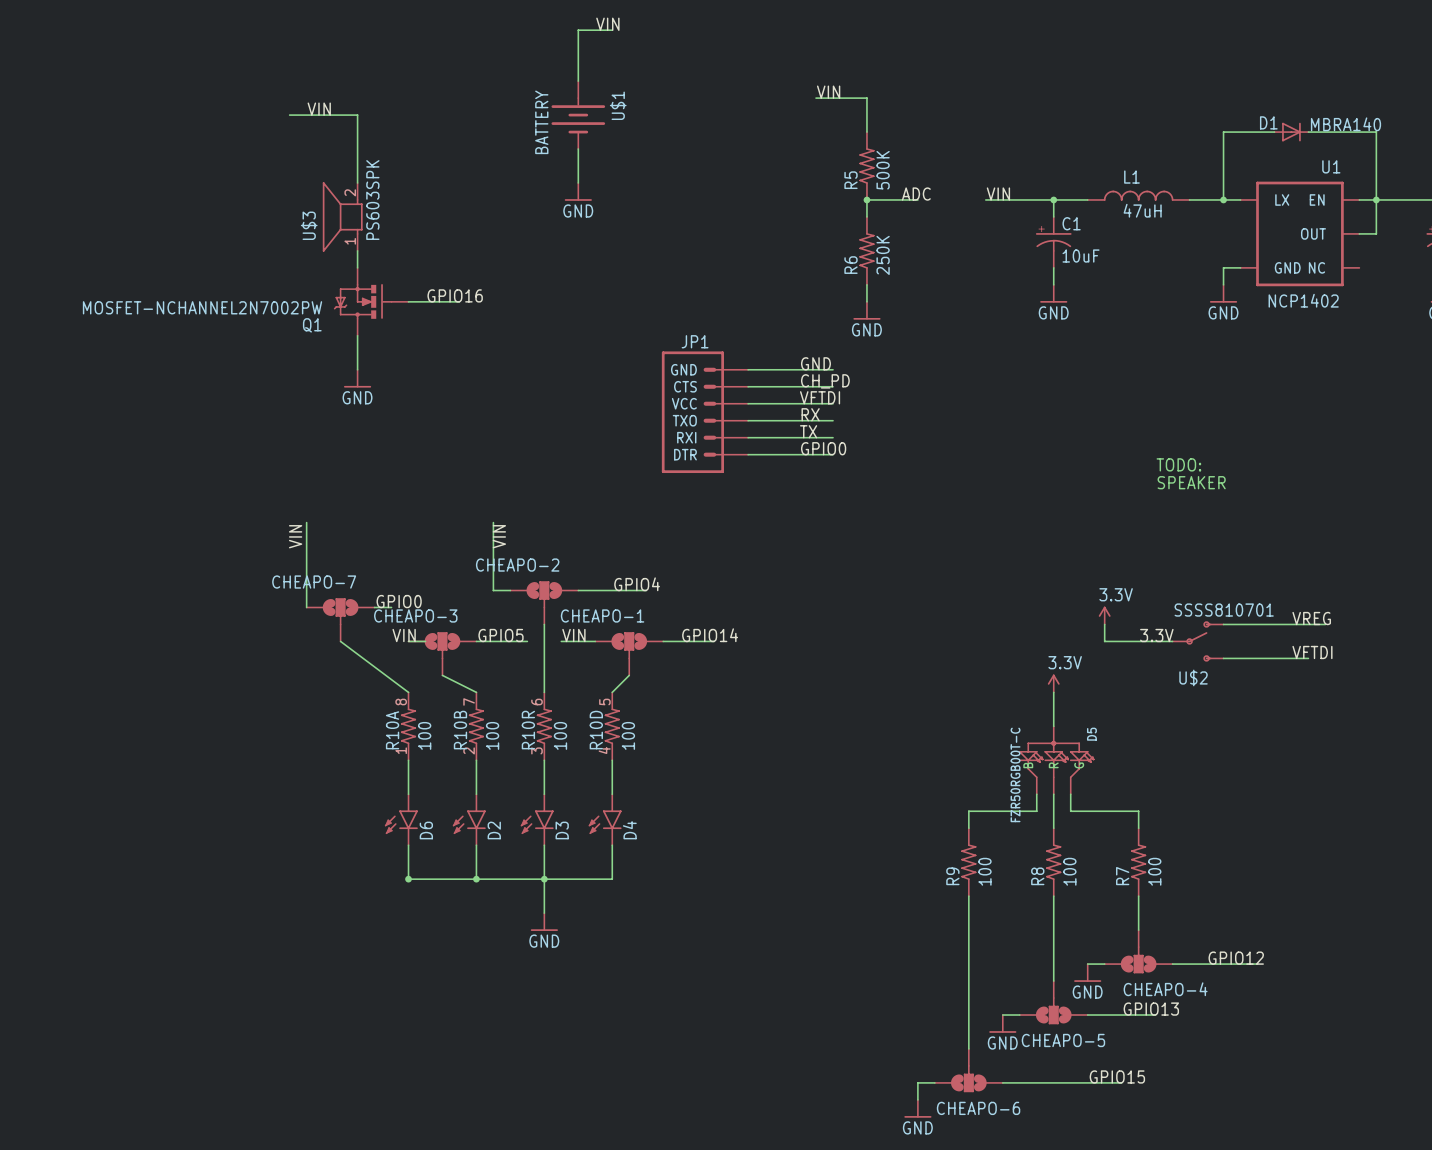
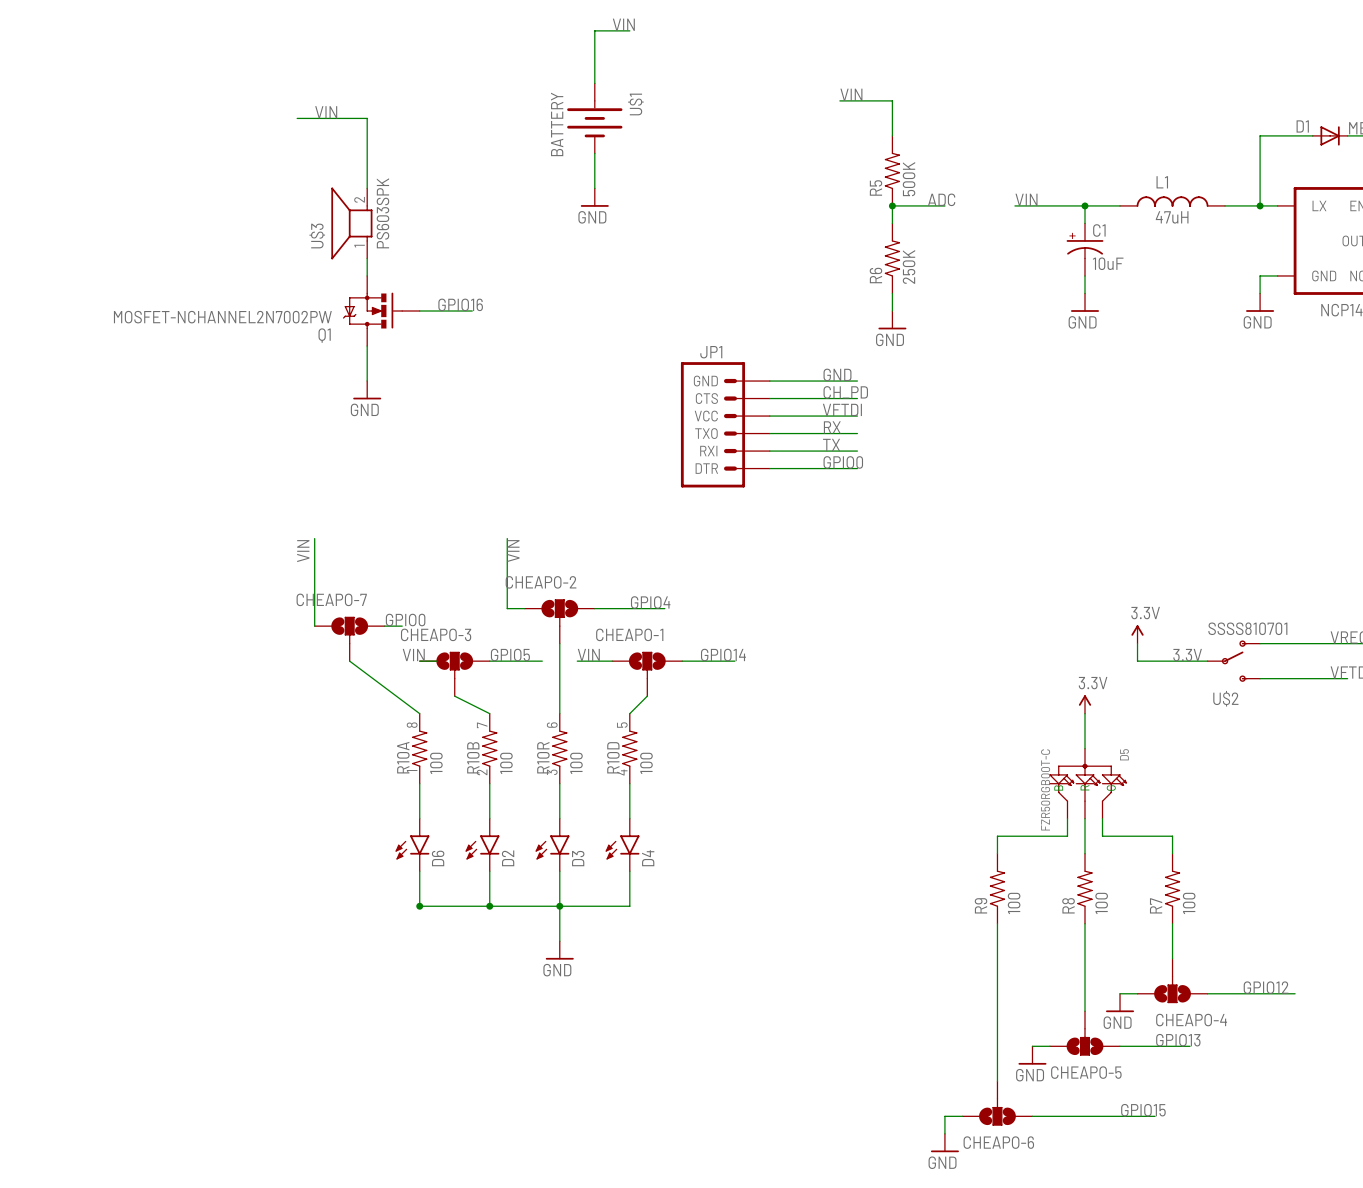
text: TODO: (1178, 464) -> none
text: SPEAKER (1191, 482) -> none

